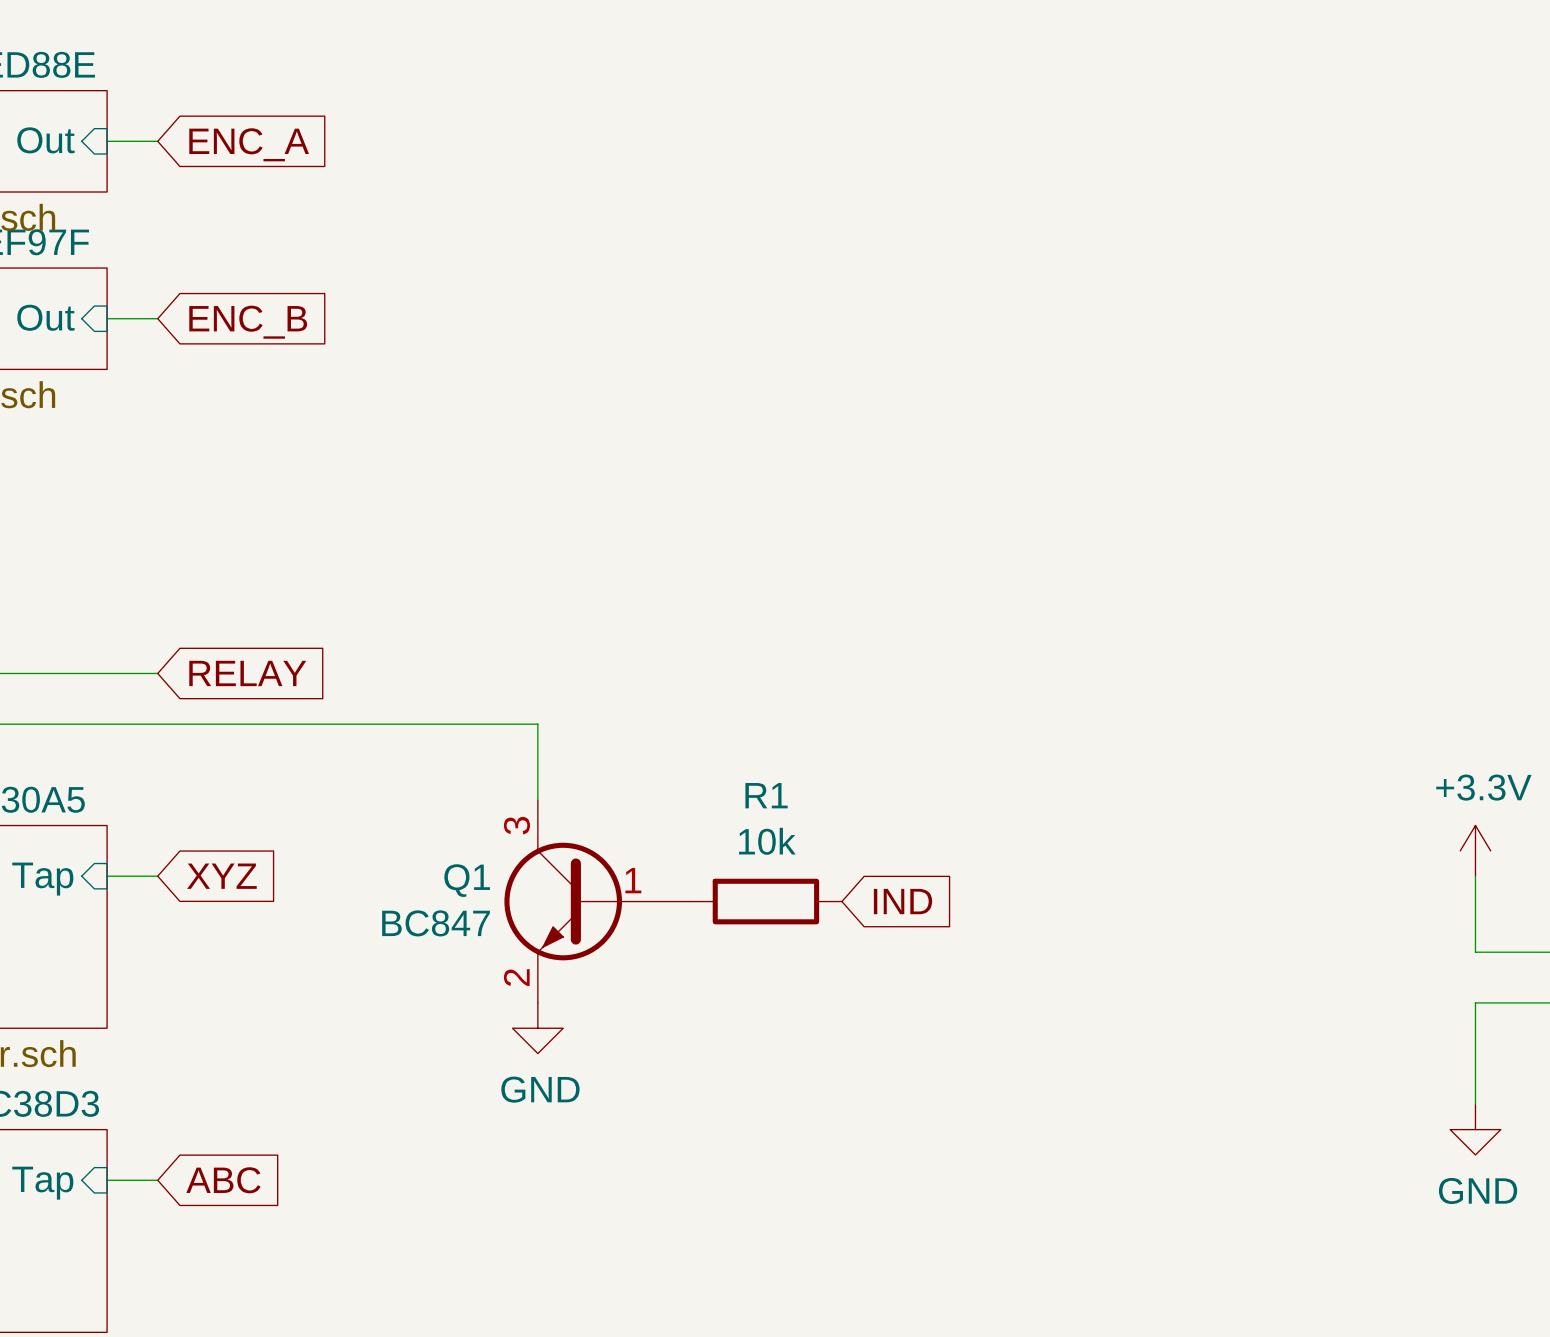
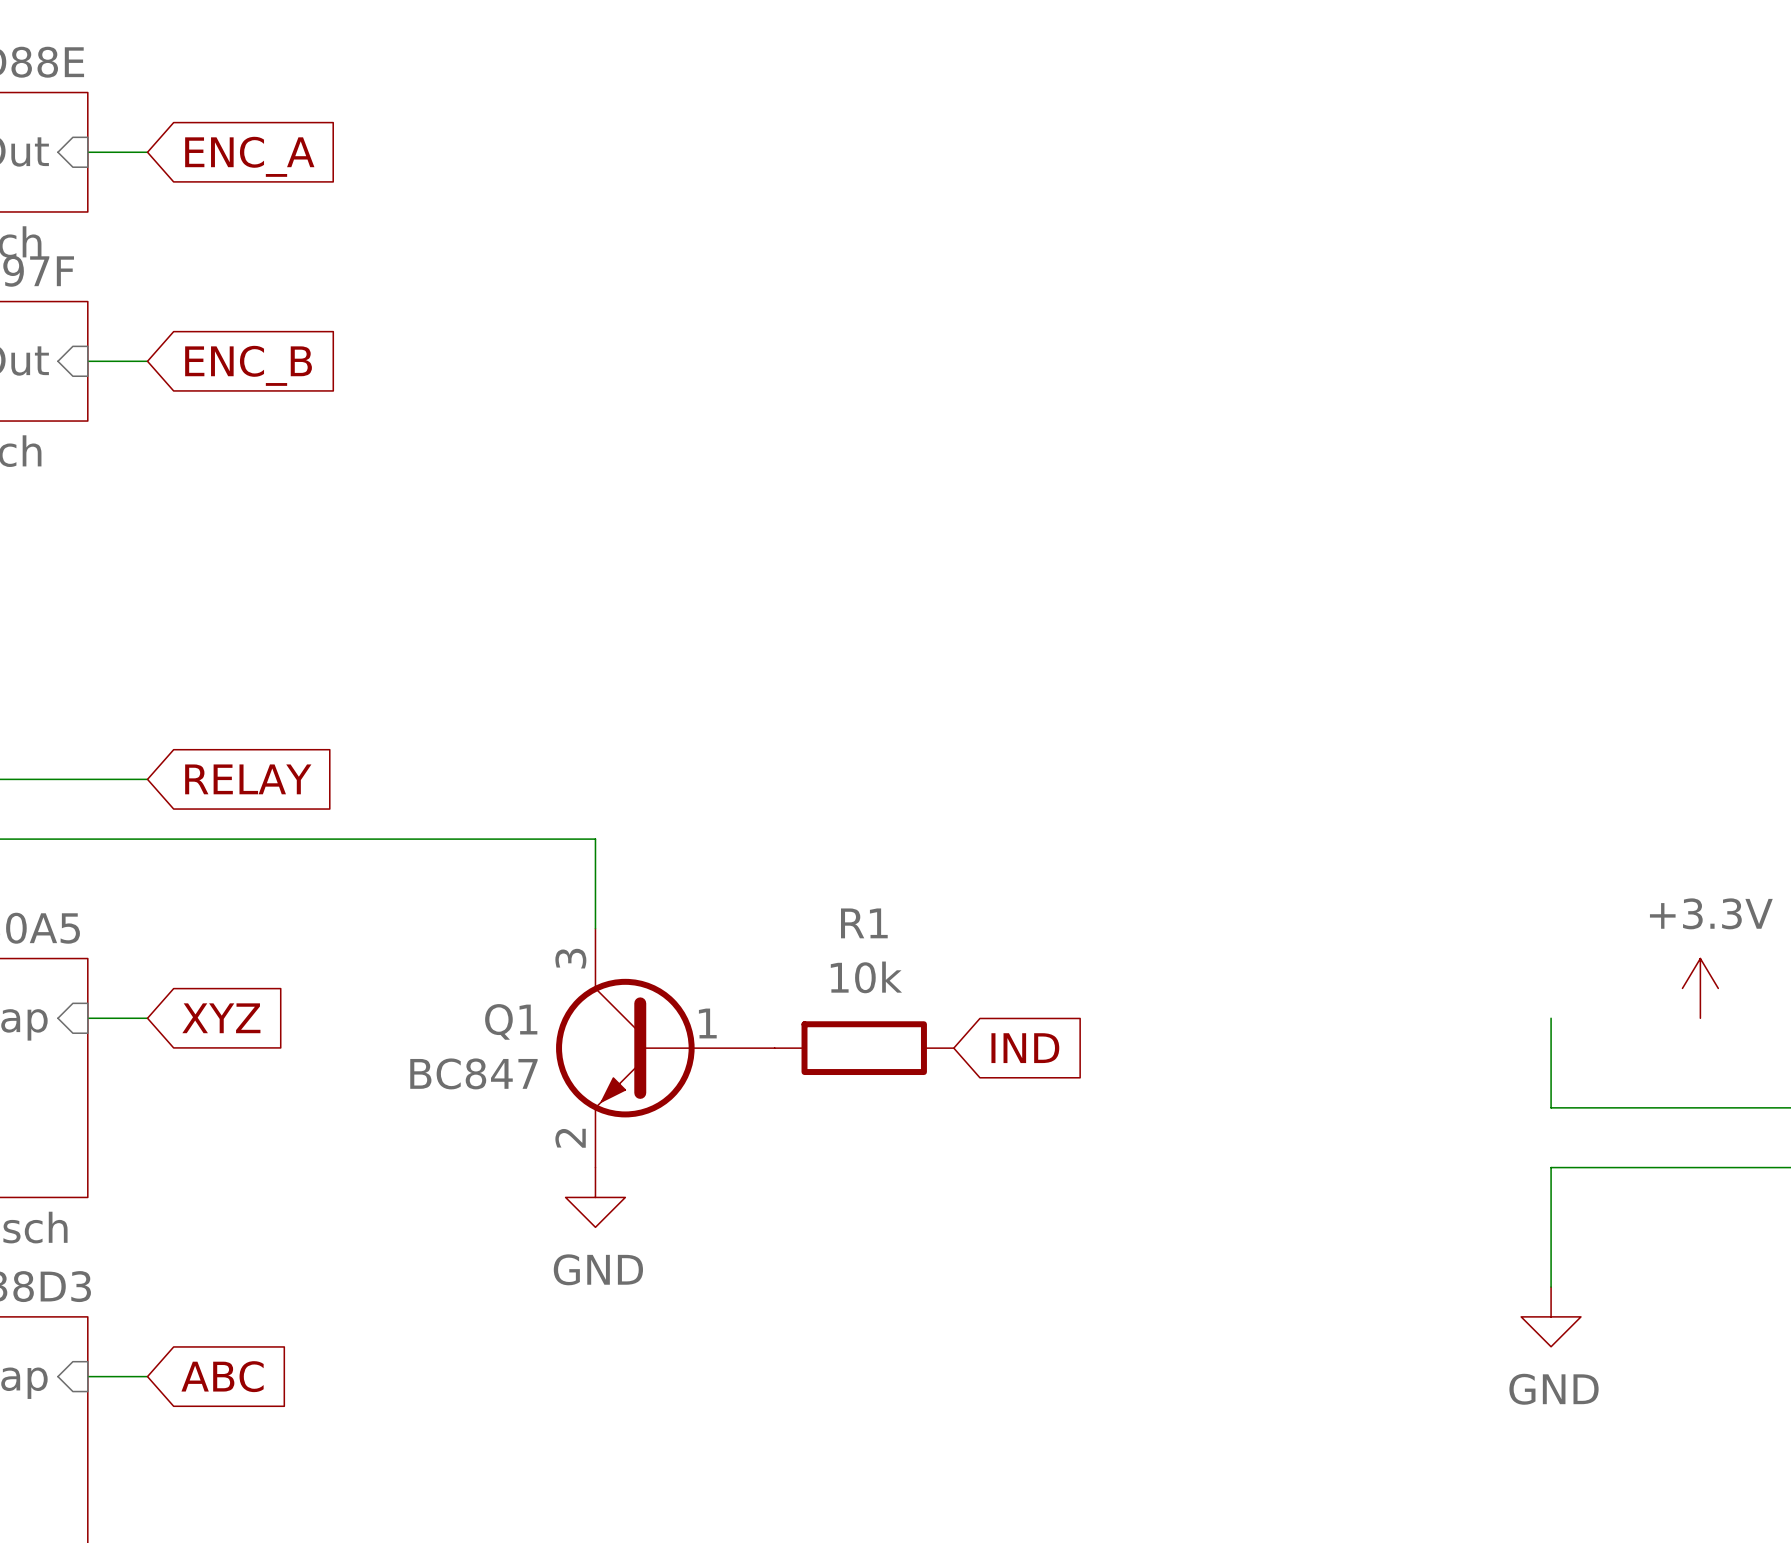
wire: (1475, 876) (1475, 952) -> (1551, 1018) (1551, 1107) (1700, 1107)
wire: (1475, 1002) (1475, 1104) -> (1700, 1167) (1551, 1167) (1551, 1287)
power symbol position: GND (1475, 1129) -> GND (1551, 1316)

